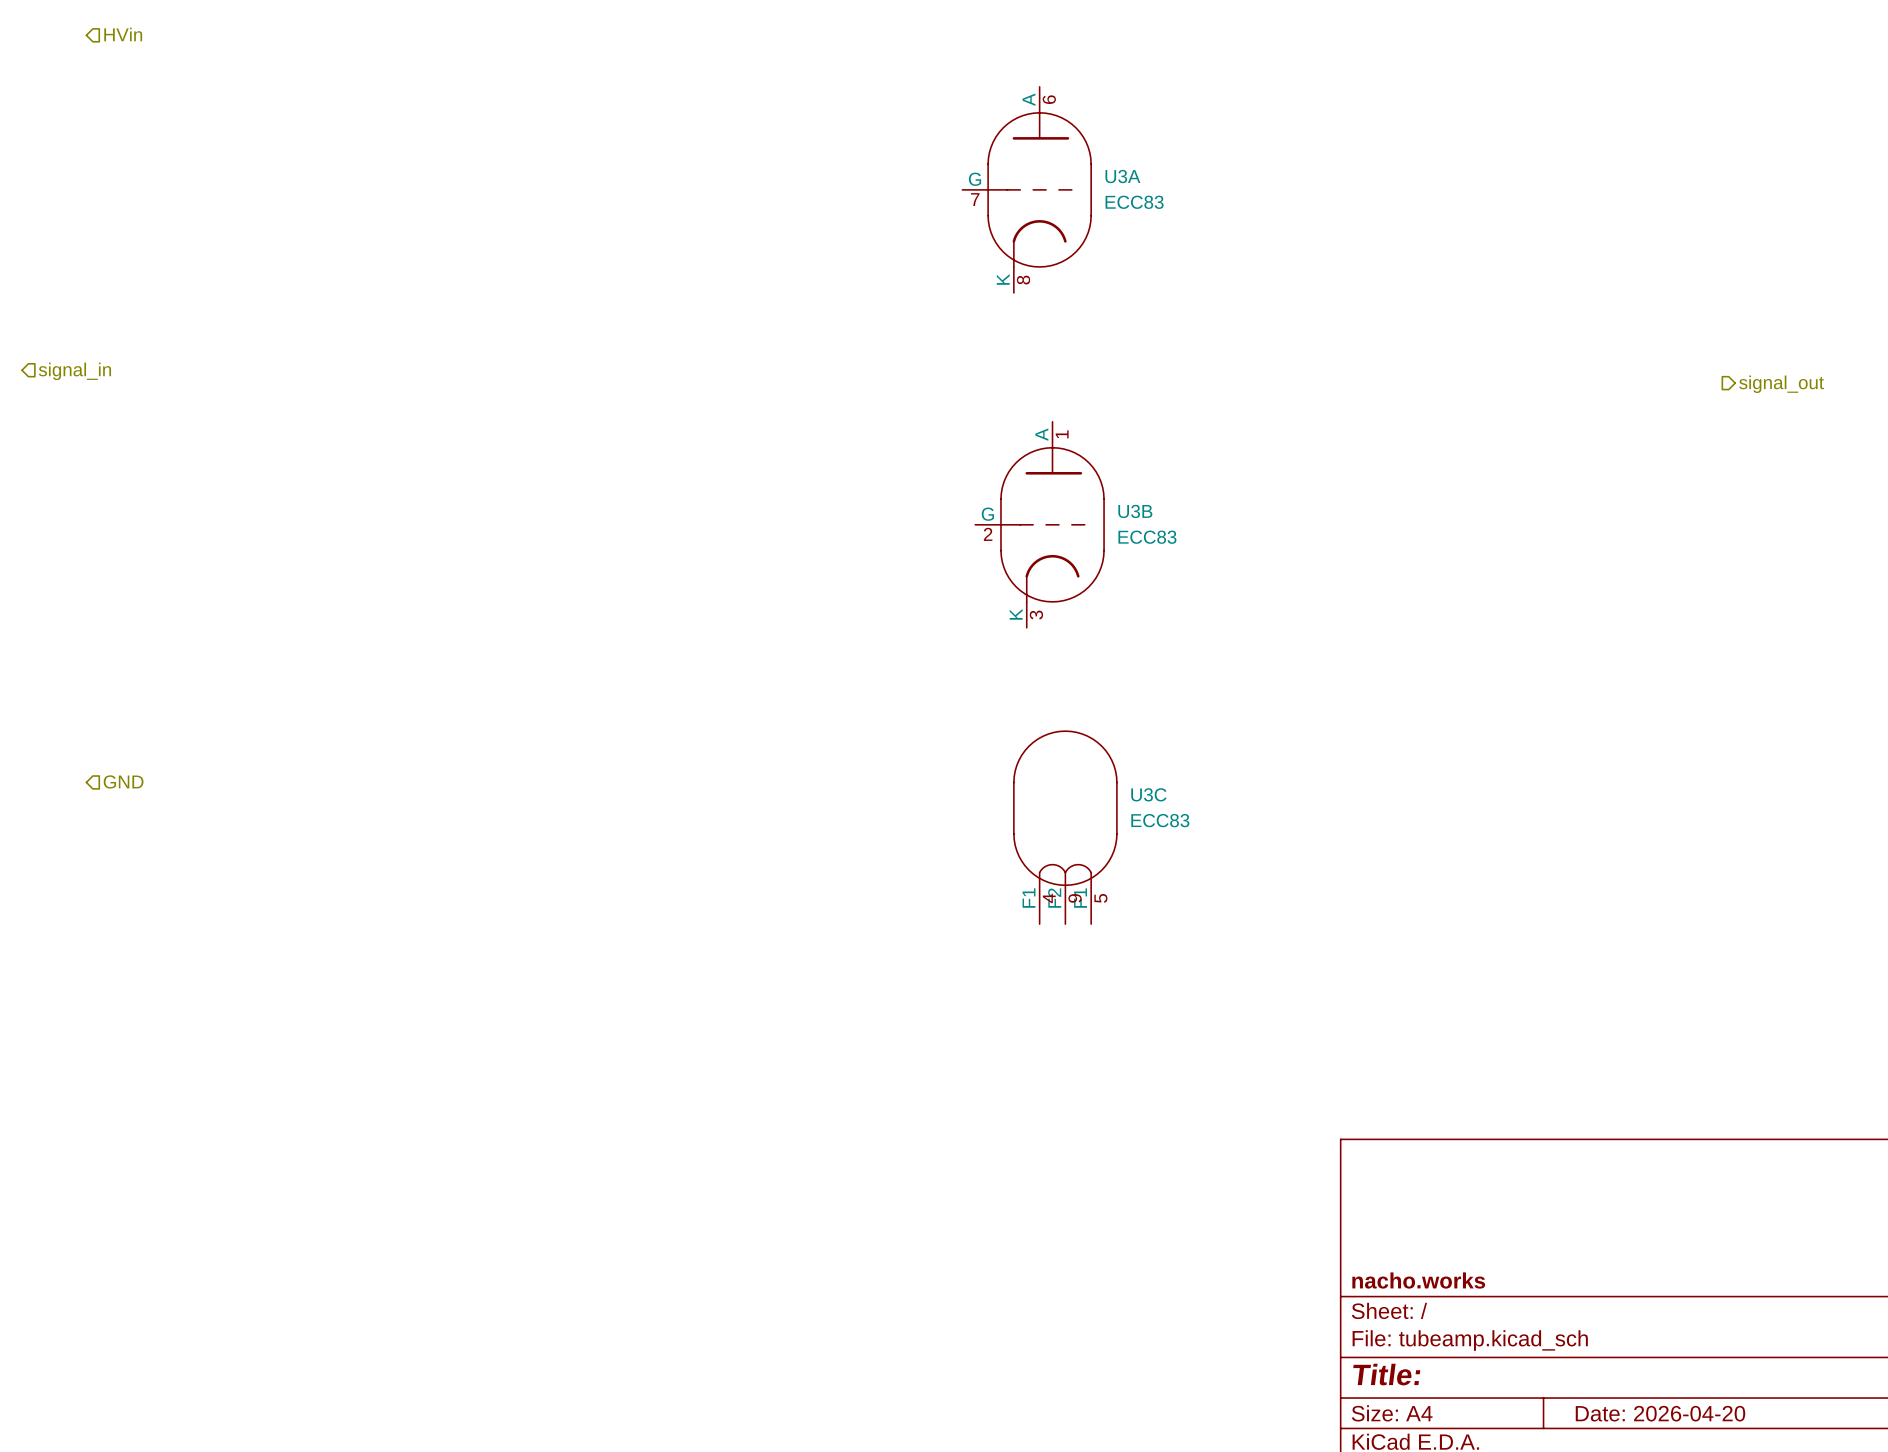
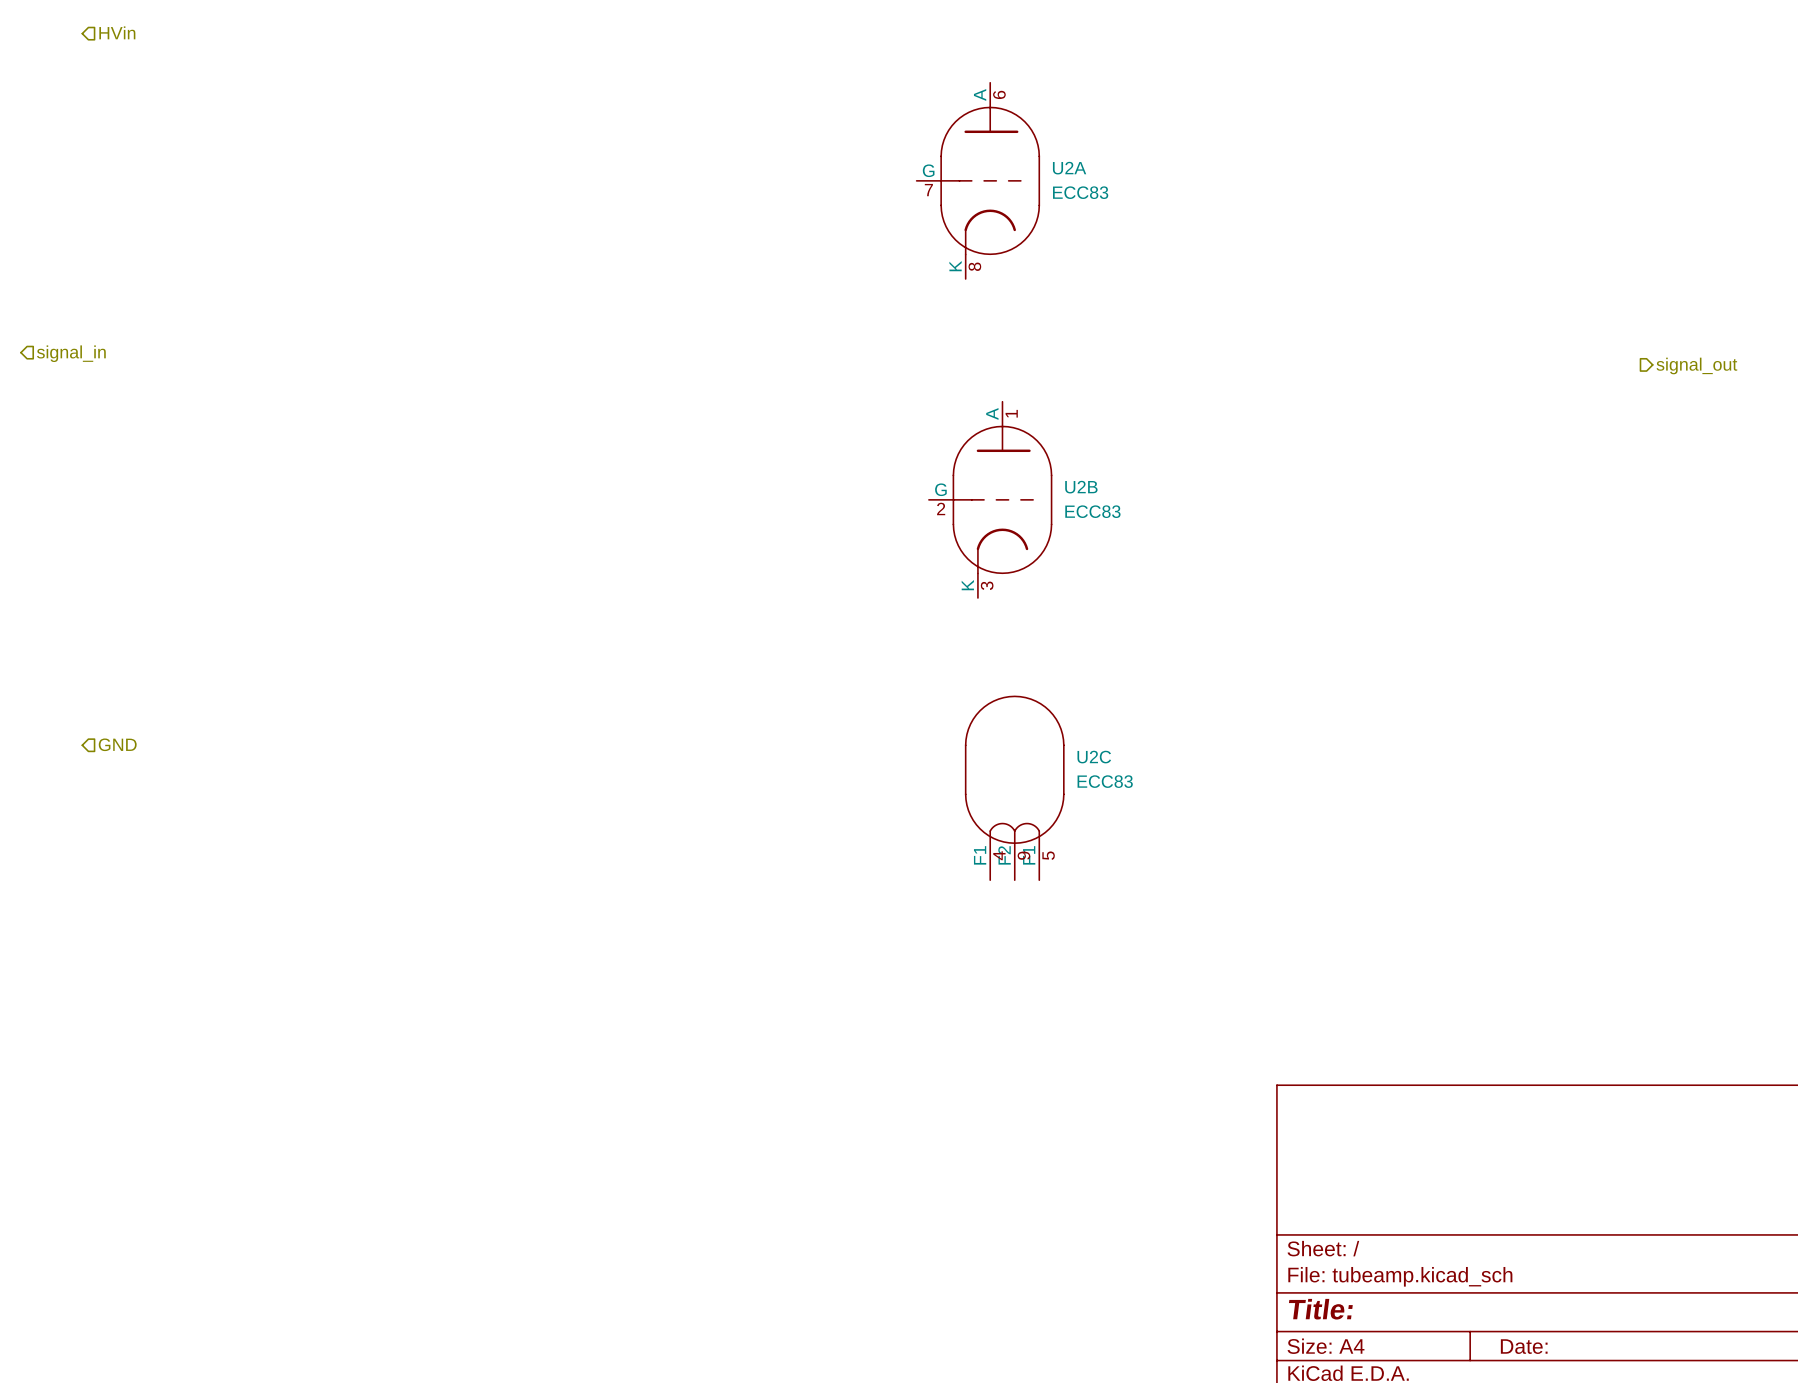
U3A name: U3A (1122, 176) -> U2A (1069, 168)
U3B name: U3B (1135, 511) -> U2B (1081, 487)
U3C name: U3C (1148, 794) -> U2C (1094, 757)
title block: nacho.works (1418, 1280) -> none
title block: Date: 2026-04-20 (1660, 1413) -> Date: (1524, 1346)

